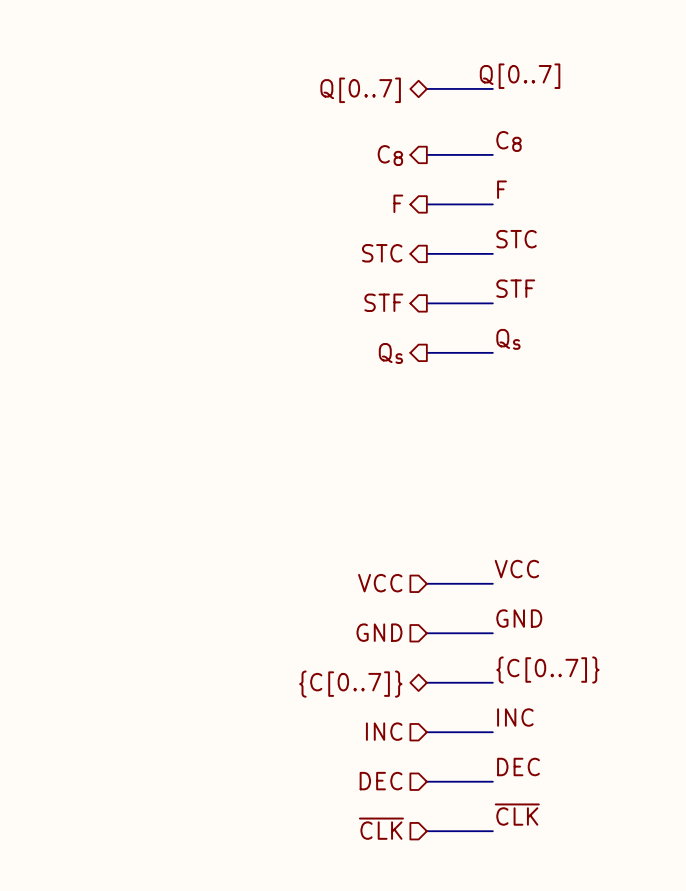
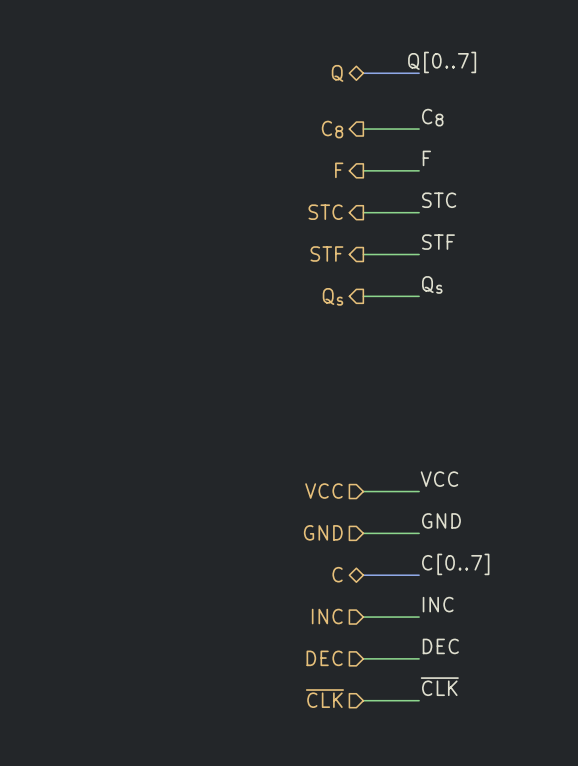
hierarchical label: Q[0..7] (360, 90) -> Q (337, 73)
label: {C[0..7]} (547, 670) -> C[0..7] (455, 564)
hierarchical label: {C[0..7]} (350, 684) -> C (337, 574)

